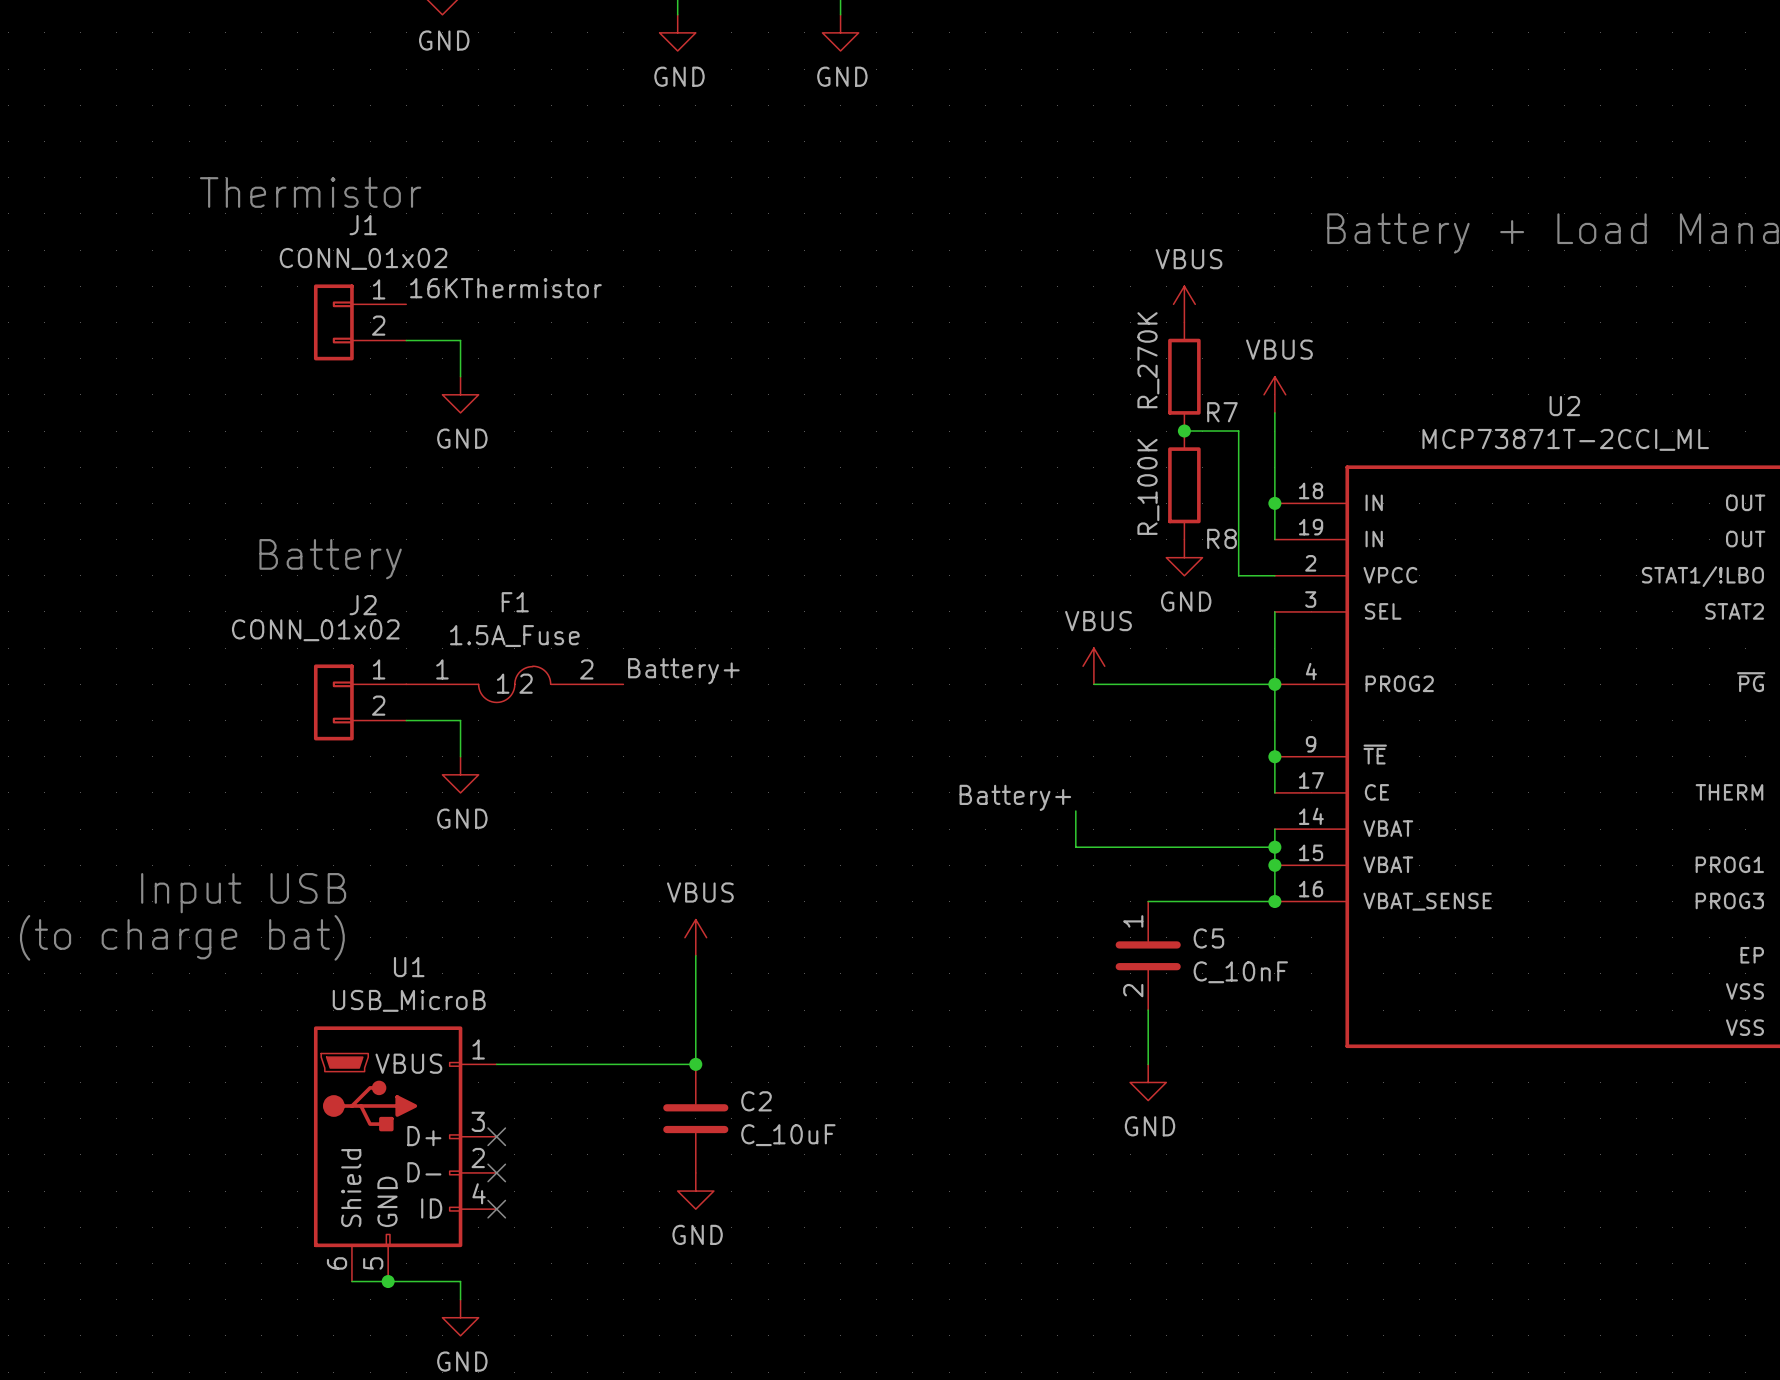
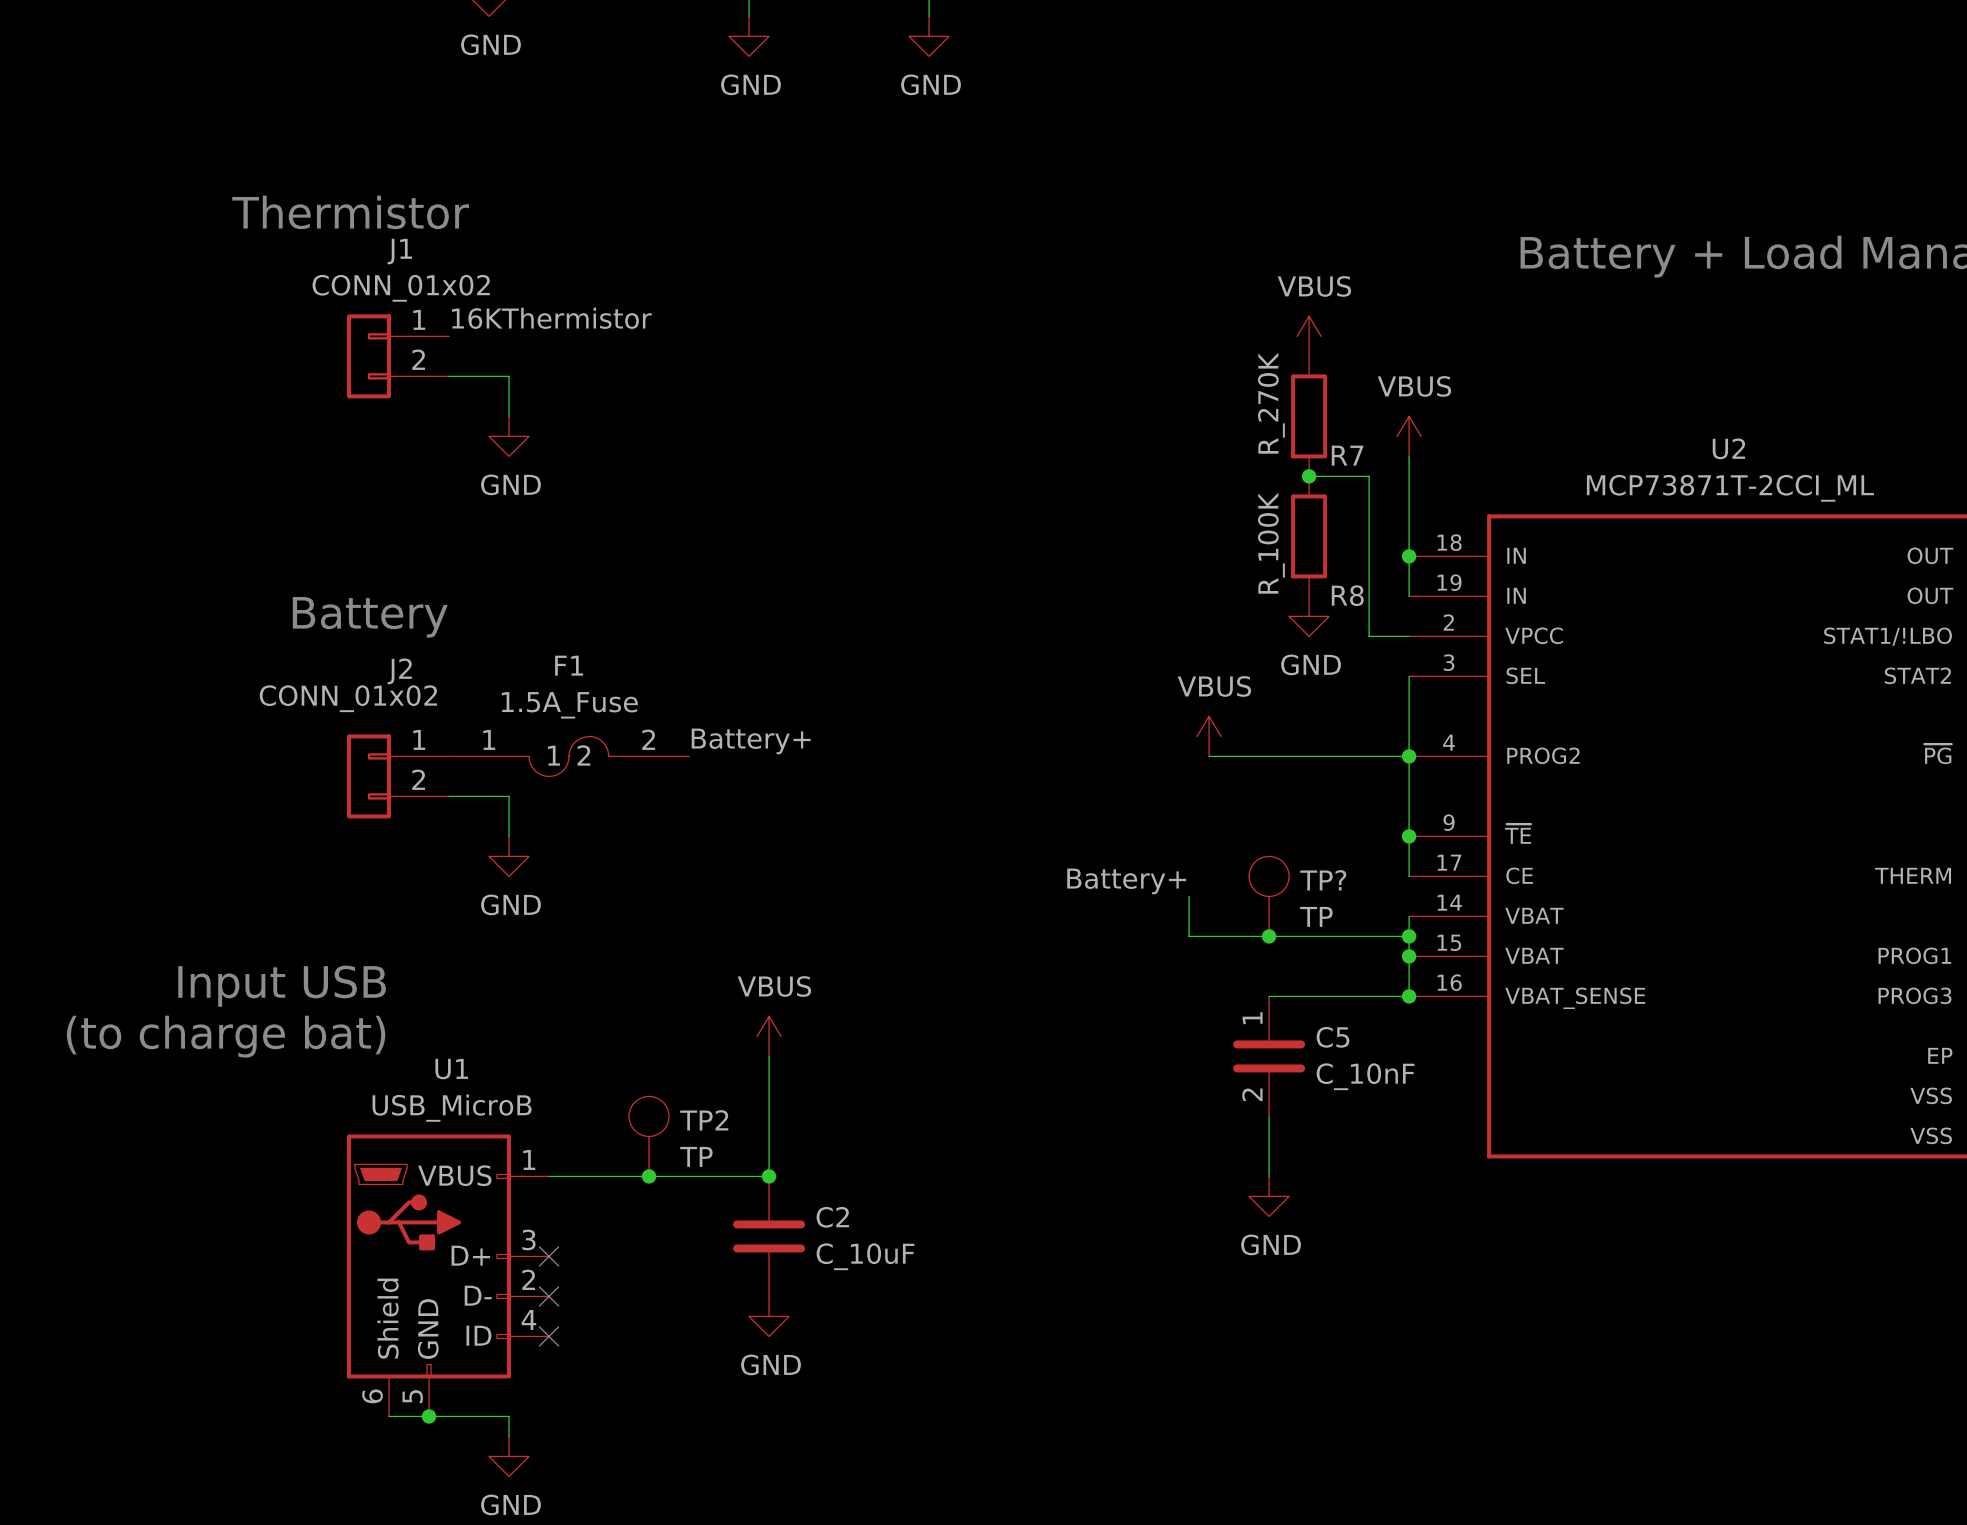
TP?: none -> TP (1269, 896)
junction: none -> (1269, 936)
TP2: none -> TP (649, 1136)
junction: none -> (649, 1176)

